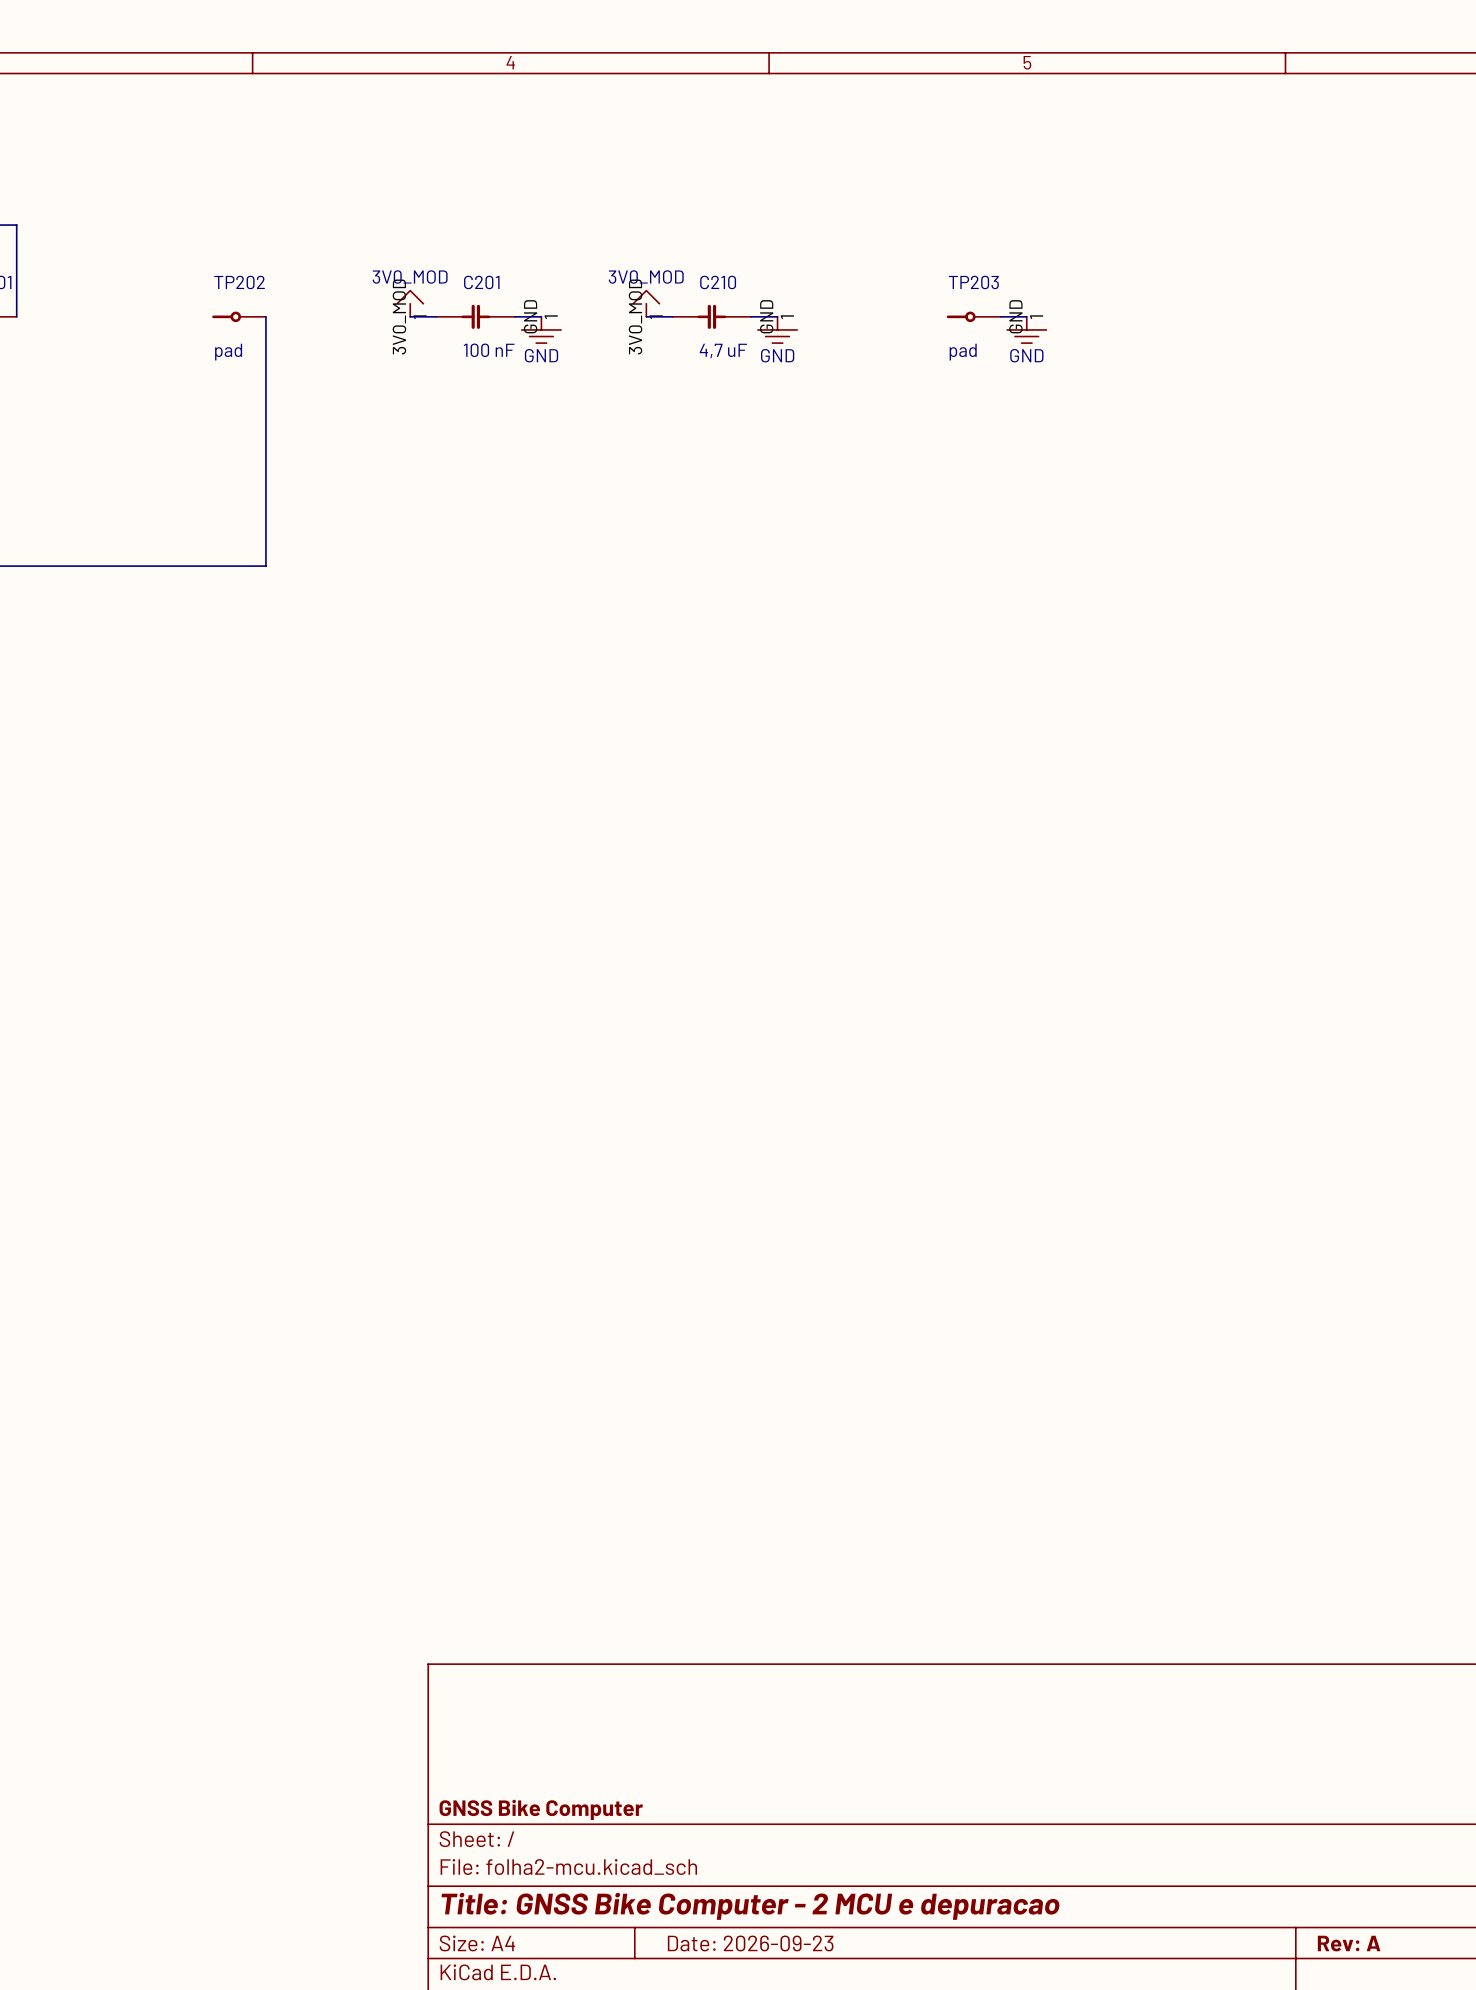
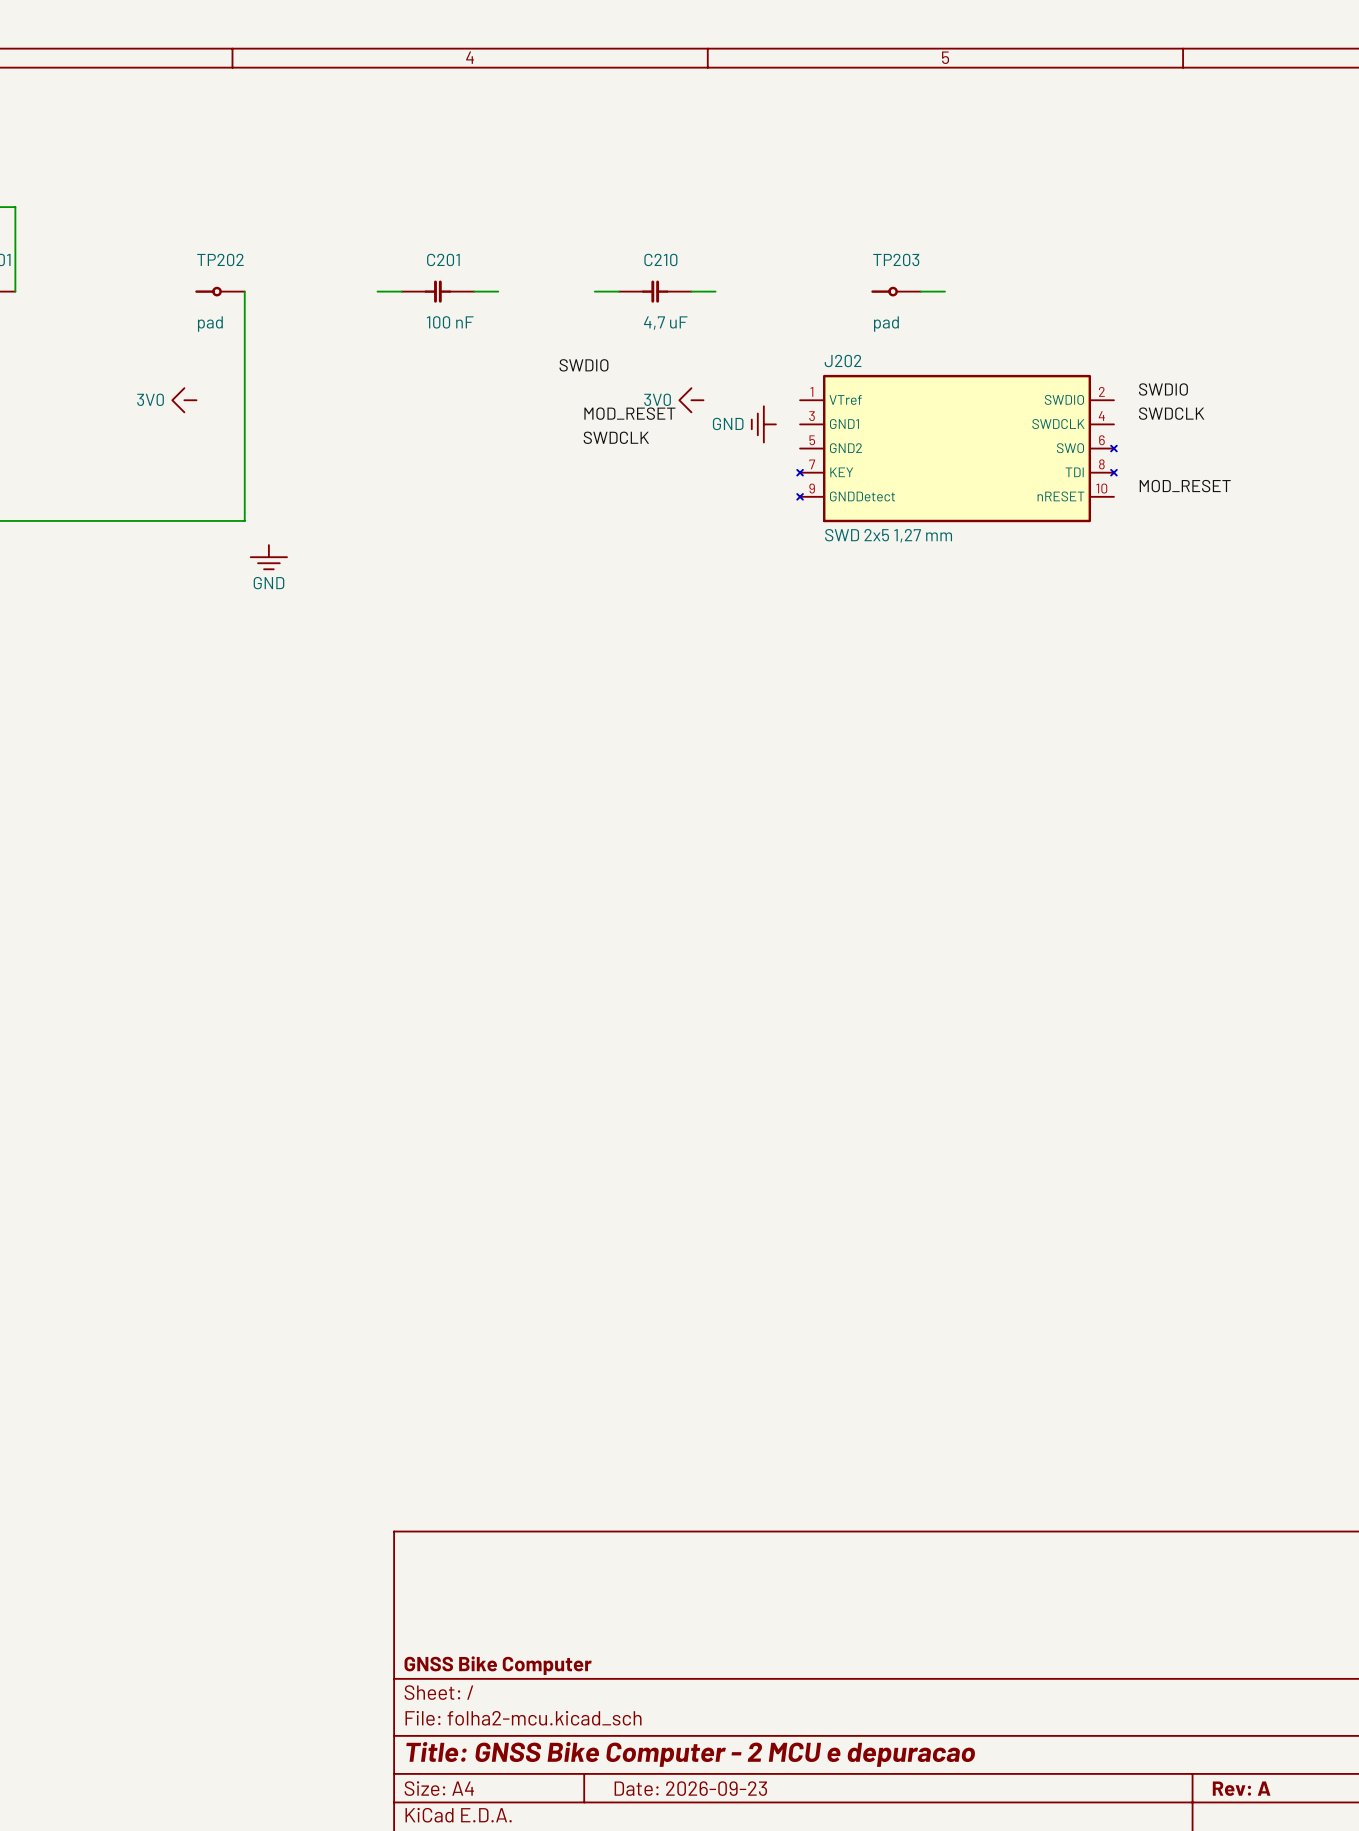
power symbol: 3V0_MOD (410, 303) -> none
power symbol: 3V0_MOD (646, 303) -> none
power symbol: GND (541, 329) -> none
power symbol: GND (777, 329) -> none
power symbol: GND (1026, 329) -> none
label: none -> SWDIO (583, 365)
label: none -> SWDIO (1163, 389)
power symbol: none -> 3V0 (184, 400)
power symbol: none -> 3V0 (691, 400)
label: none -> MOD_RESET (629, 413)
label: none -> SWDCLK (1171, 413)
power symbol: none -> GND (763, 424)
label: none -> SWDCLK (616, 437)
J202: none -> SWD 2x5 1,27 mm (957, 448)
label: none -> MOD_RESET (1185, 486)
power symbol: none -> GND (268, 557)

